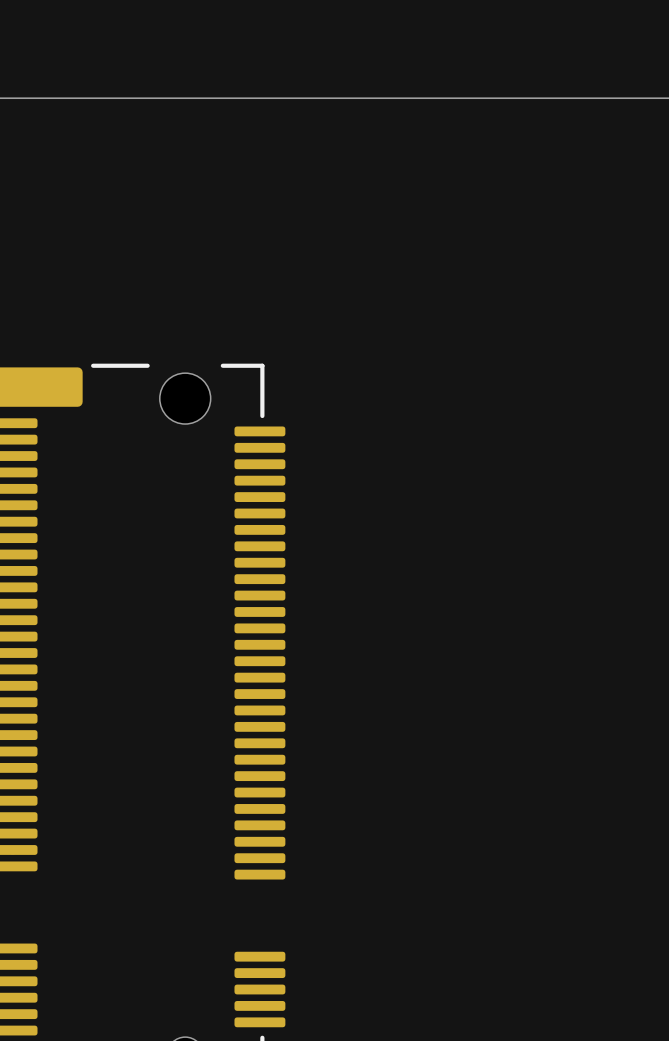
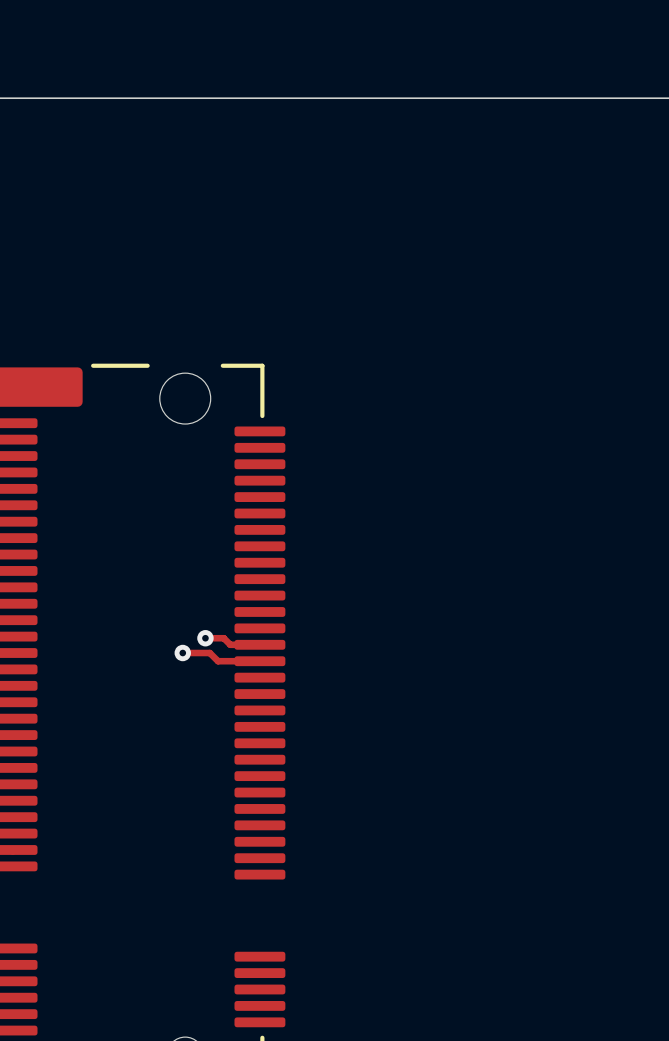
track: none -> (205, 638) (223, 638) (230, 644) (259, 644)
via: none -> (205, 638)
track: none -> (182, 653) (209, 653) (218, 661) (259, 661)
via: none -> (182, 653)

